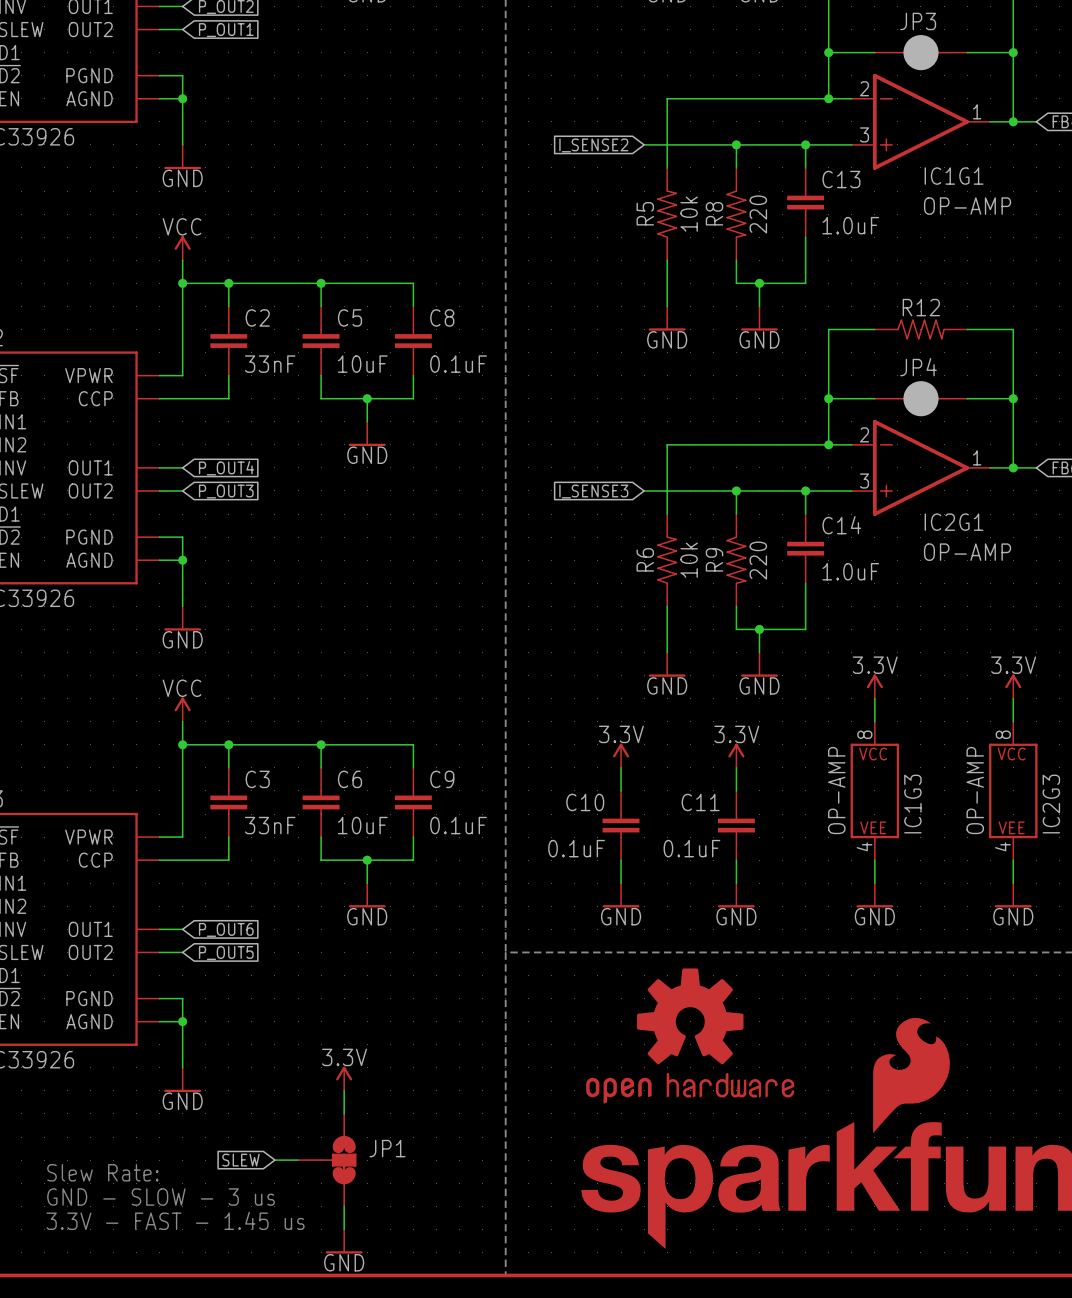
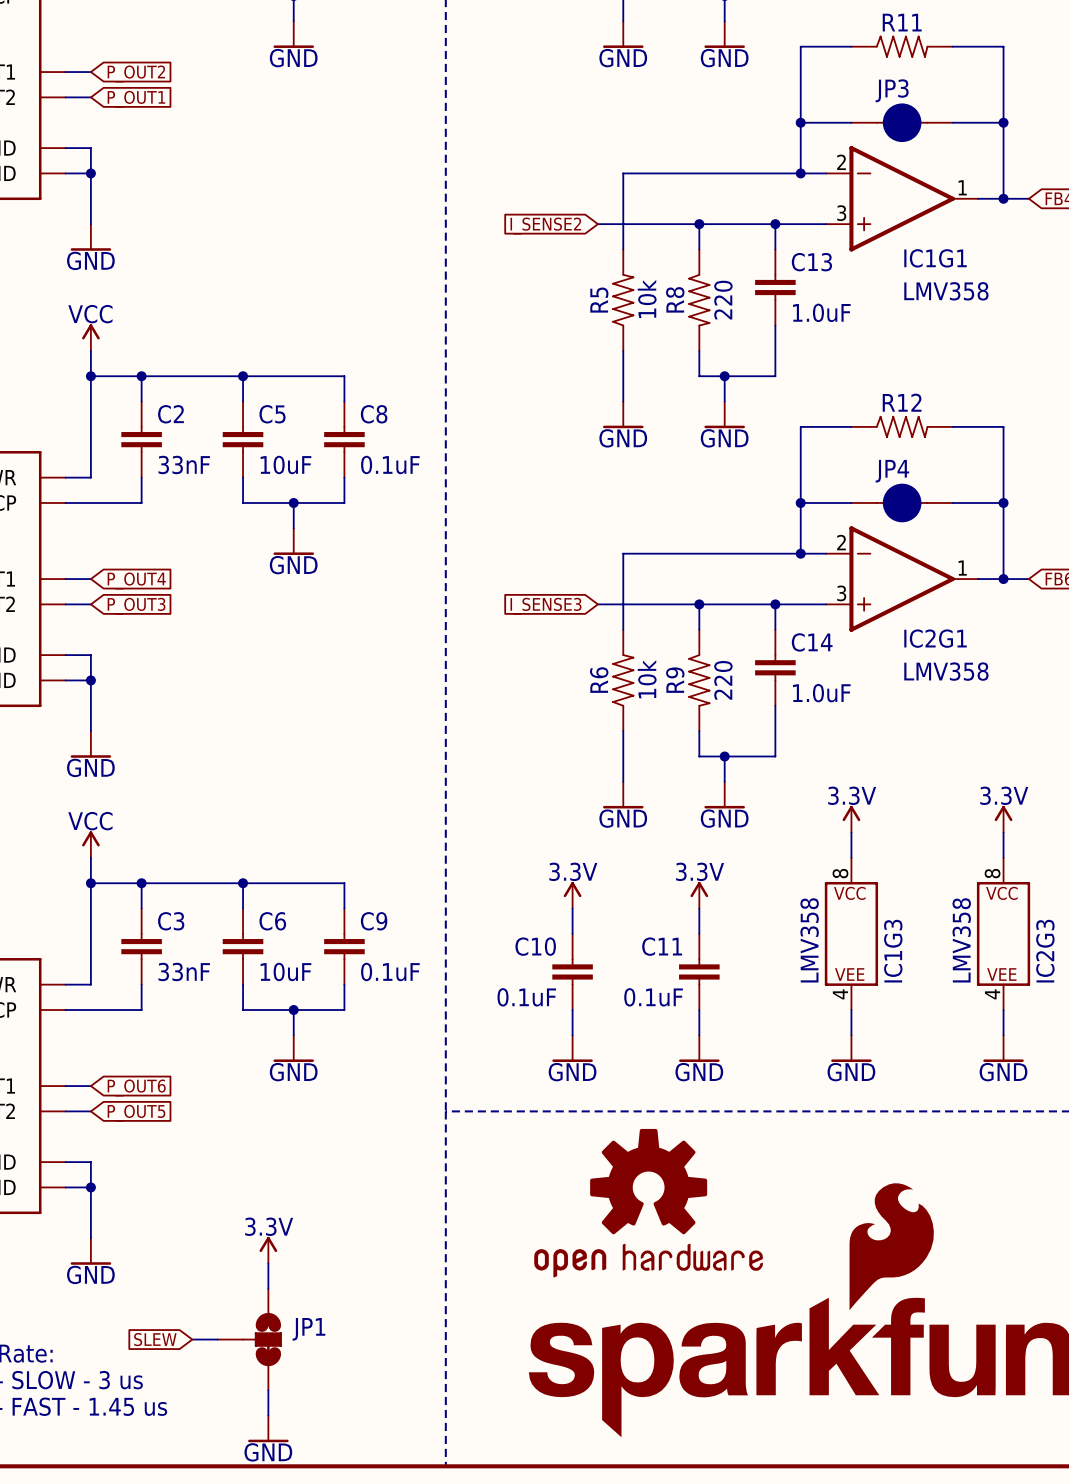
IC1G1 value: OP-AMP (967, 206) -> LMV358 (946, 291)
IC2G1 value: OP-AMP (967, 552) -> LMV358 (946, 671)
IC1G3 value: OP-AMP (836, 790) -> LMV358 (809, 940)
IC2G3 value: OP-AMP (975, 790) -> LMV358 (961, 940)

